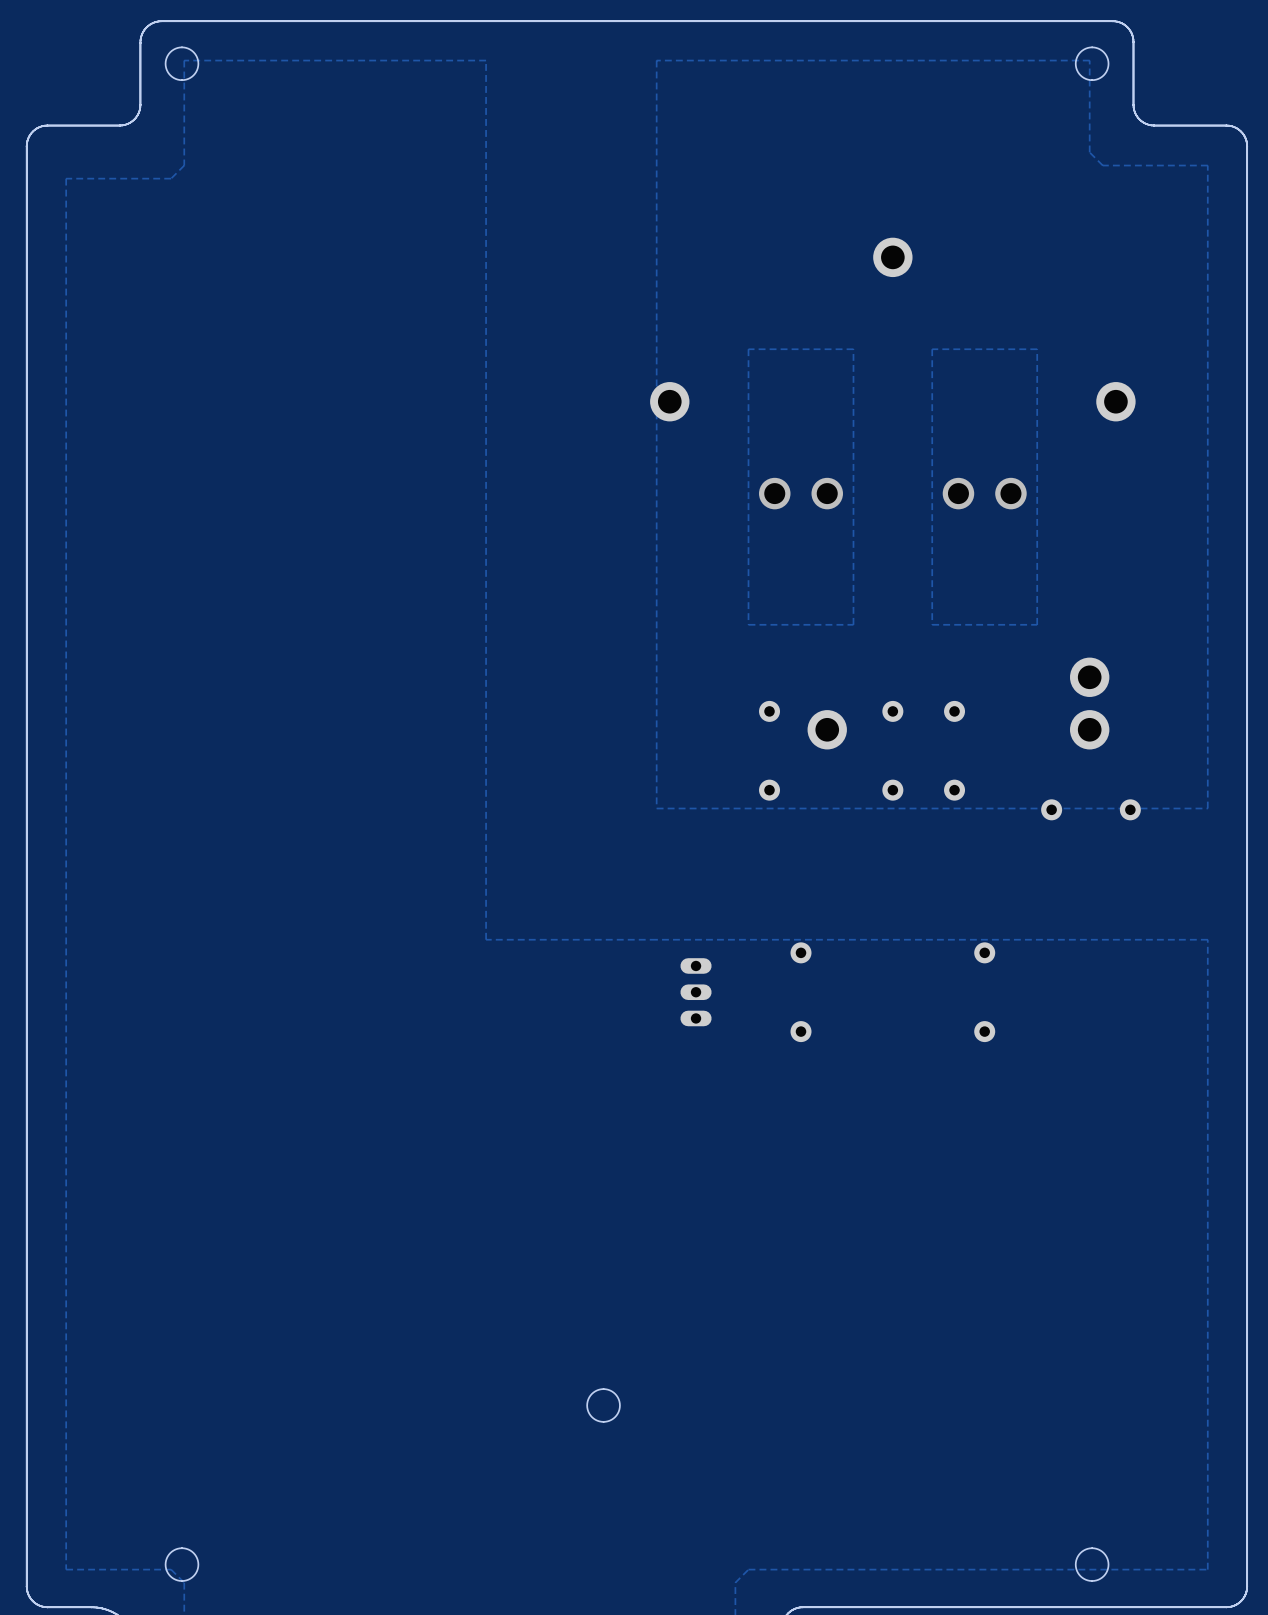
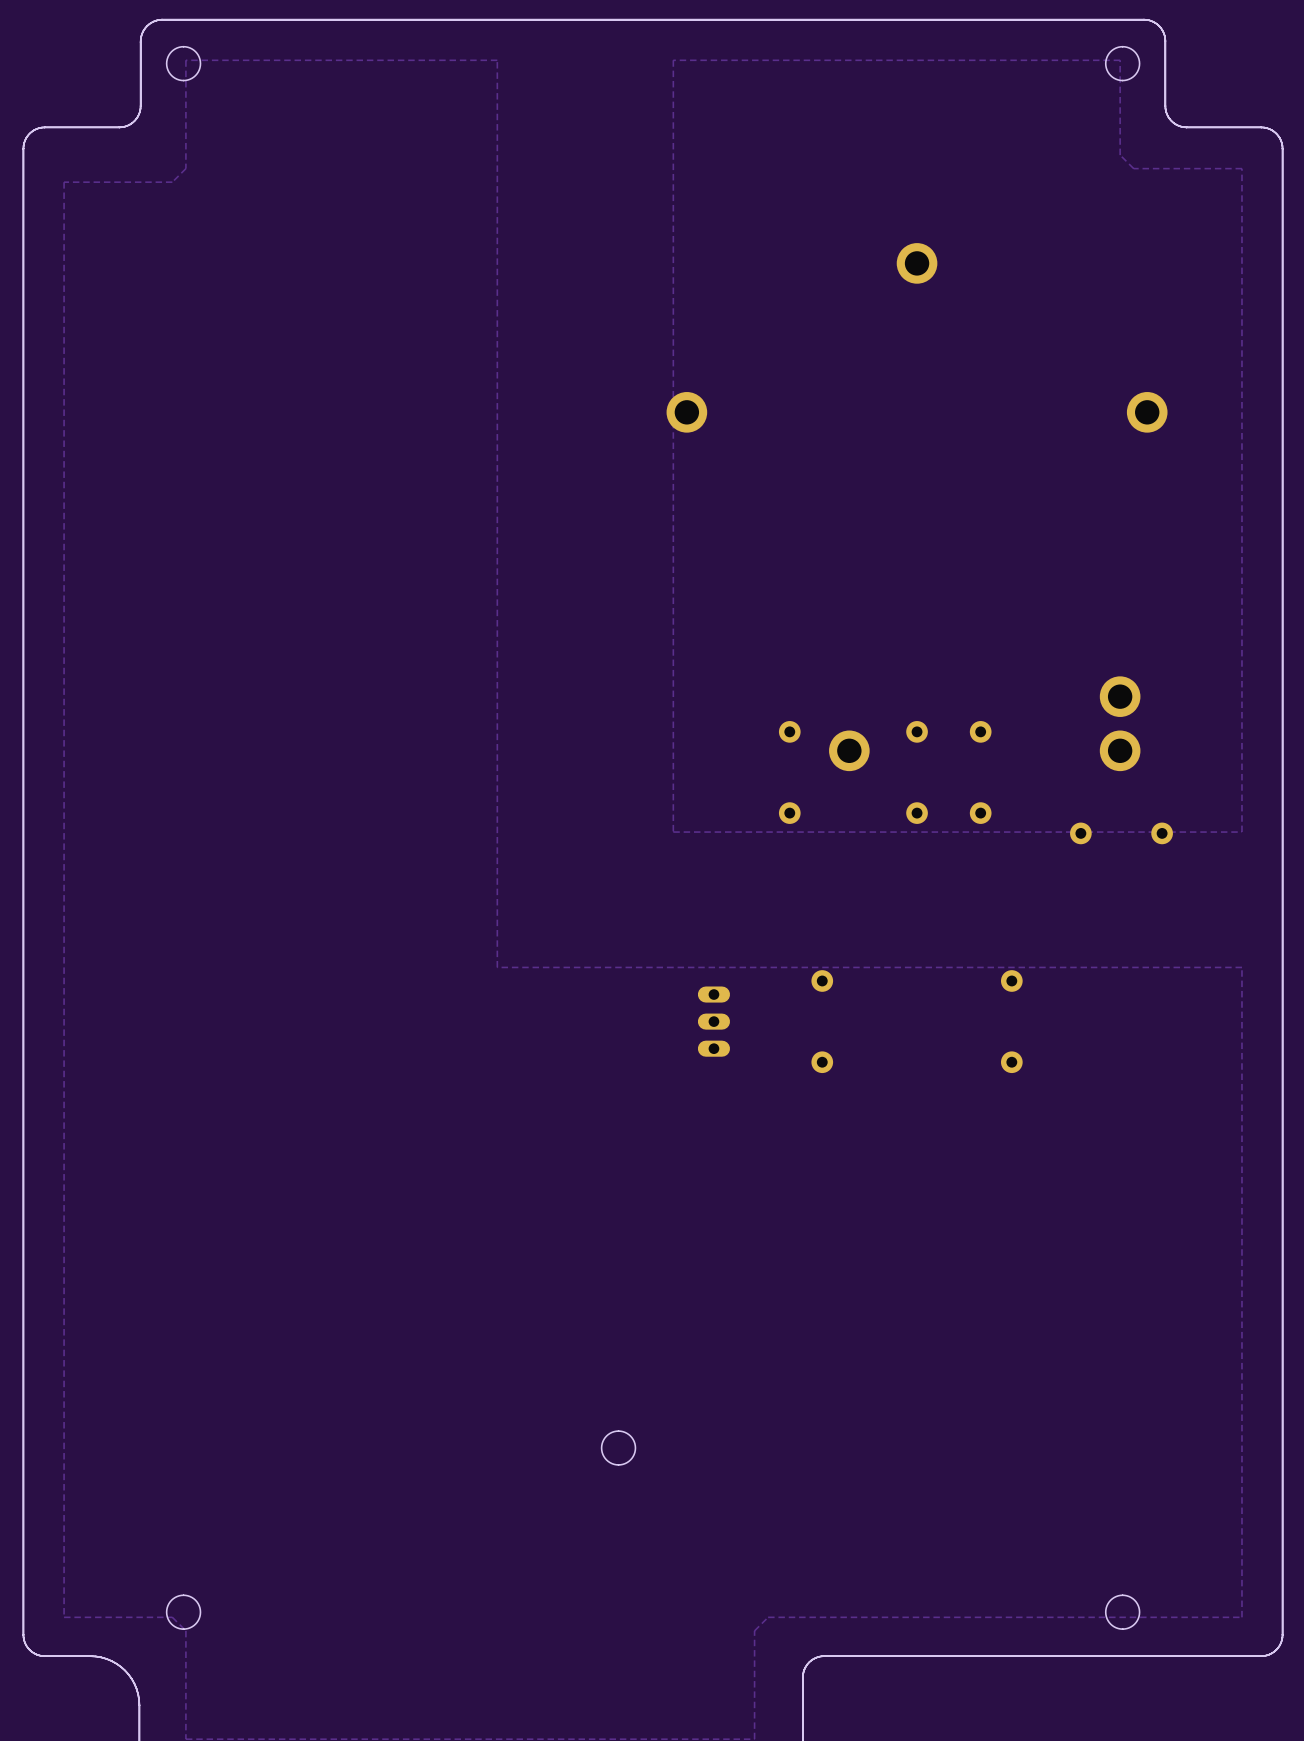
zone outline: (853, 349) (748, 349) (748, 624) (853, 624) (853, 349) -> none
zone outline: (1037, 349) (932, 349) (932, 624) (1037, 624) (1037, 349) -> none
via: (774, 493) -> none
via: (827, 493) -> none
via: (958, 493) -> none
via: (1010, 493) -> none

